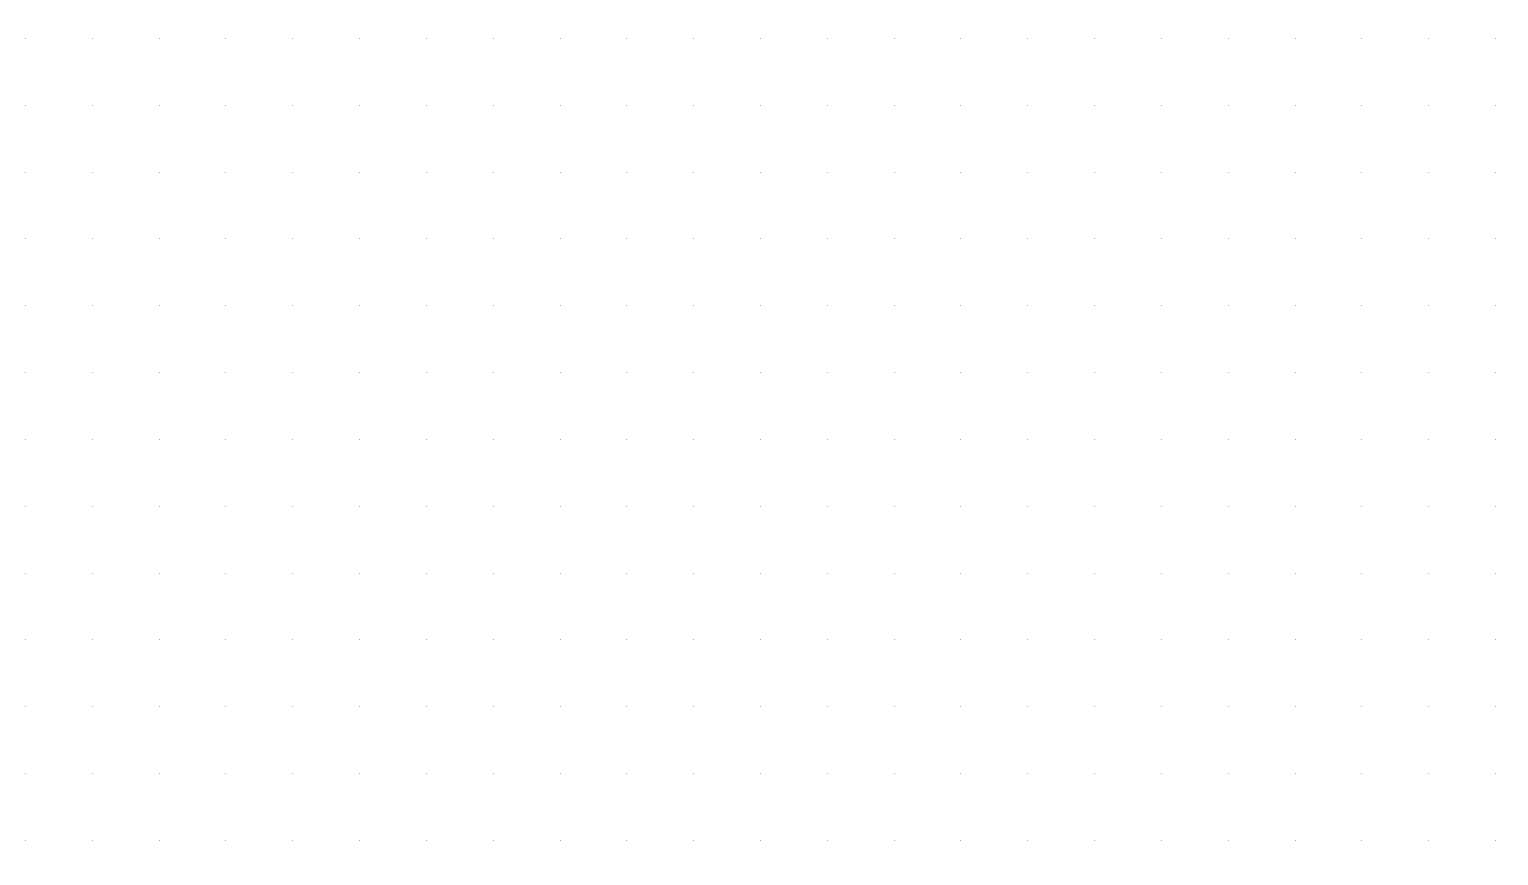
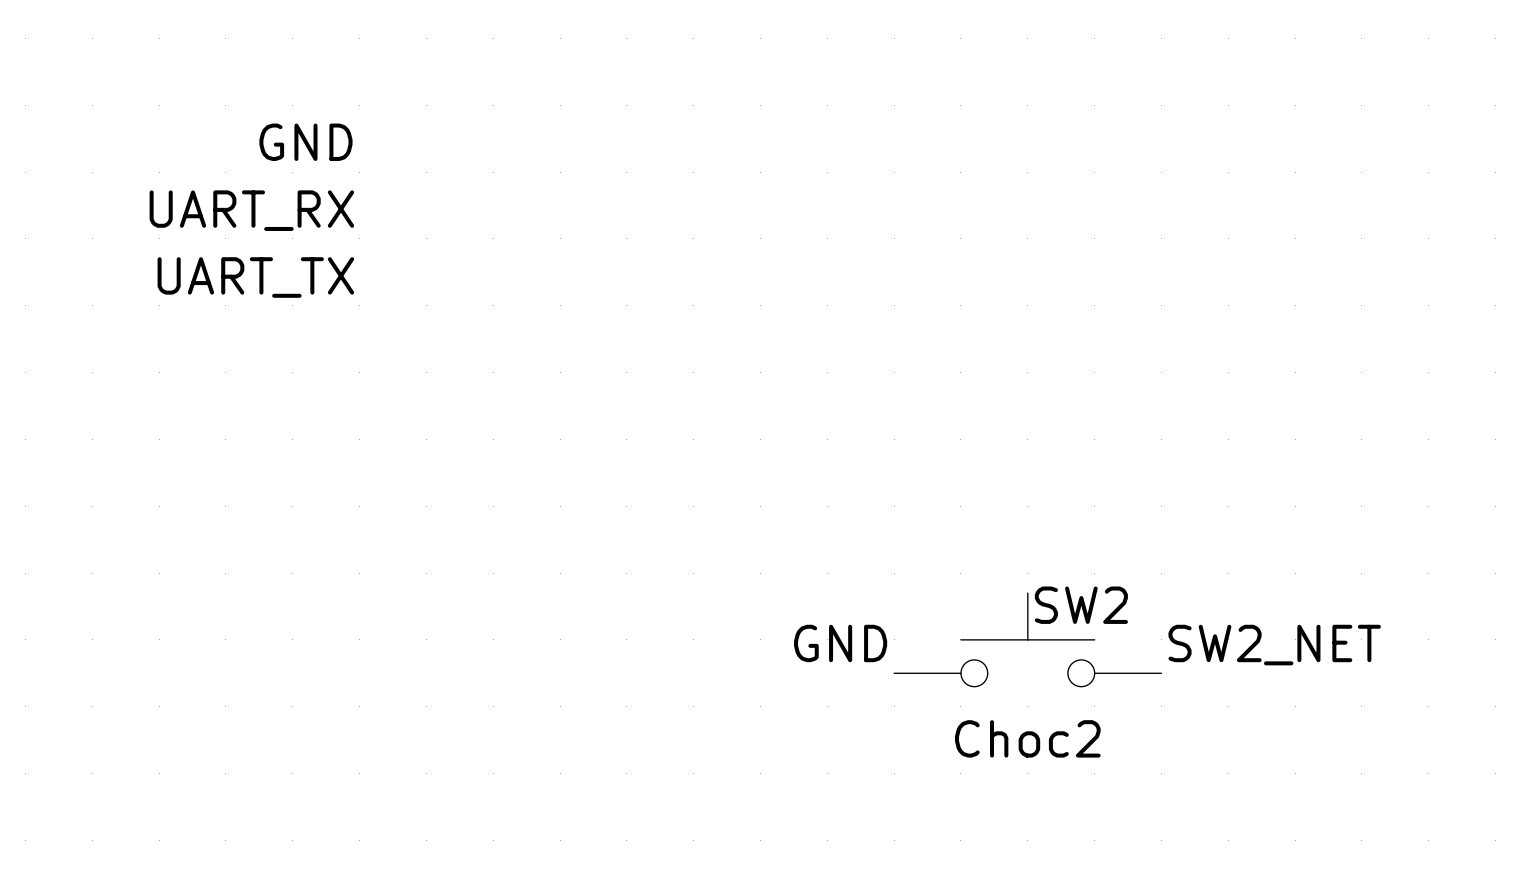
label: none -> GND (305, 142)
label: none -> UART_RX (251, 210)
label: none -> UART_TX (255, 277)
SW2: none -> Choc2 (1027, 639)
label: none -> GND (840, 643)
label: none -> SW2_NET (1274, 645)

